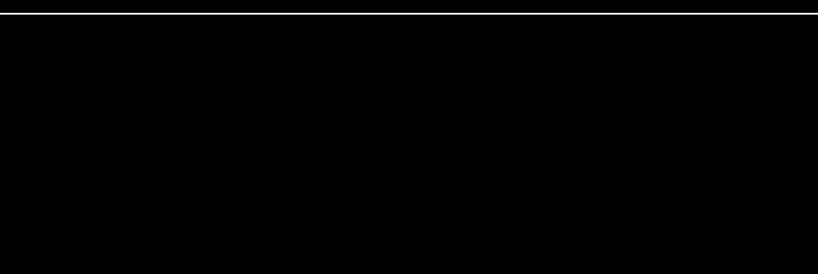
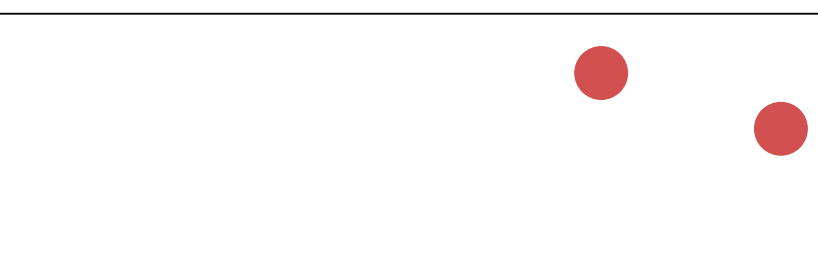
part: none -> (601, 73)
part: none -> (780, 128)

